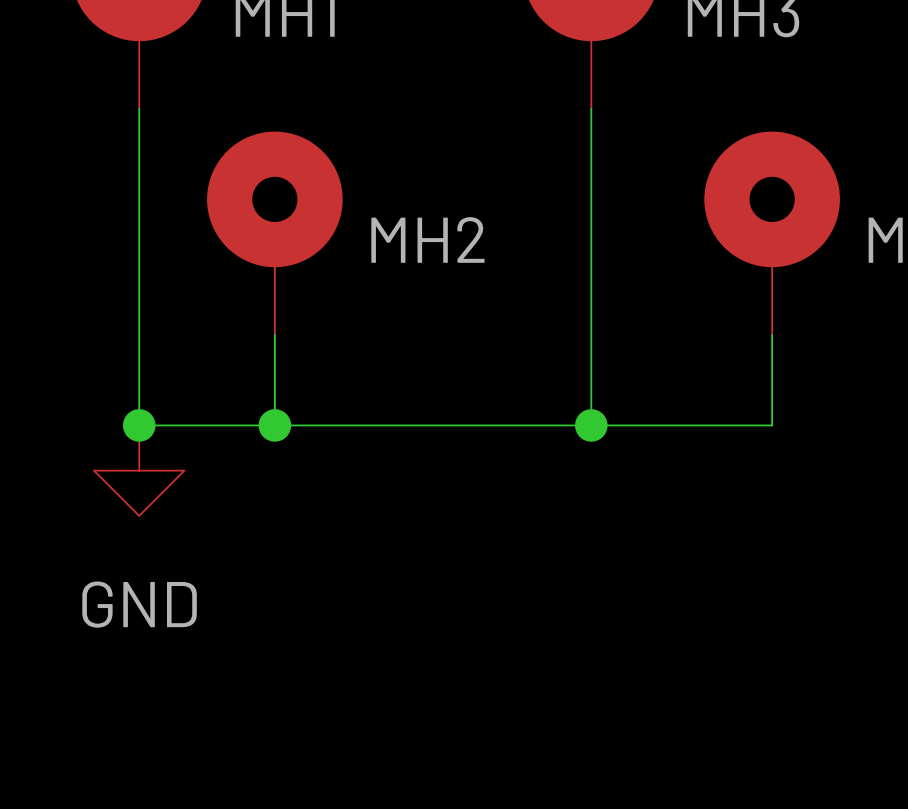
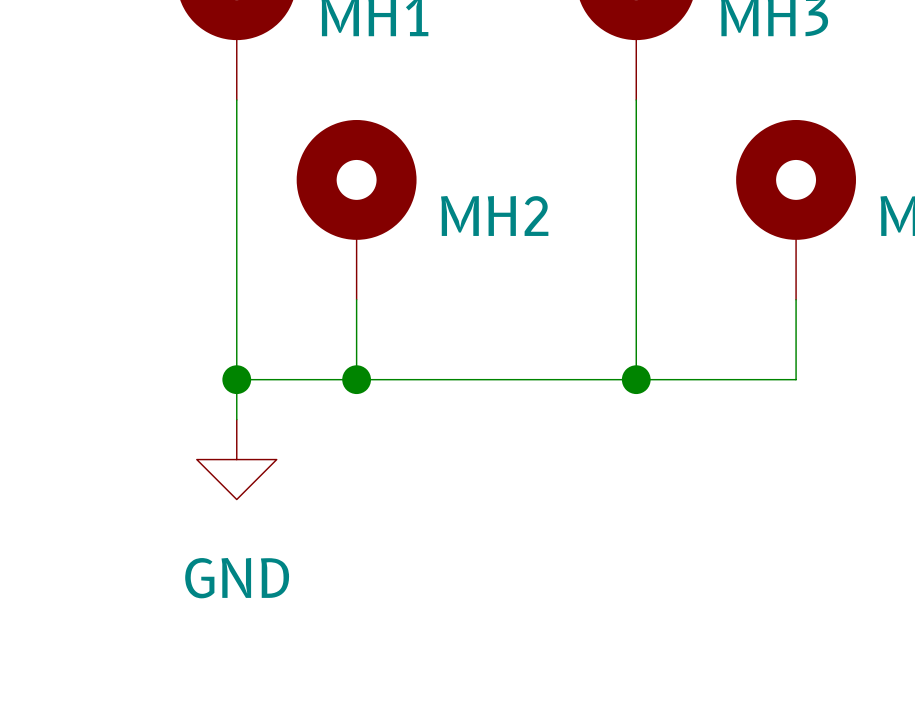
power symbol position: GND (139, 470) -> GND (236, 459)

